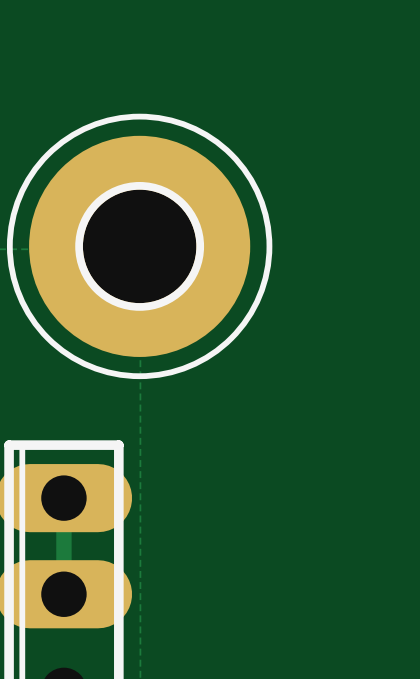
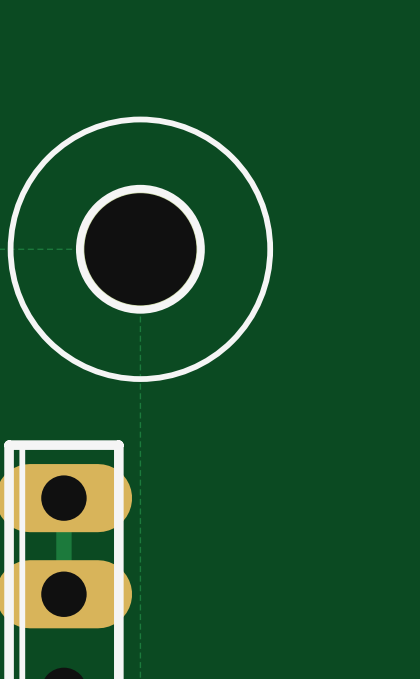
part footprint: [6, 113, 273, 380] -> [7, 116, 274, 382]

